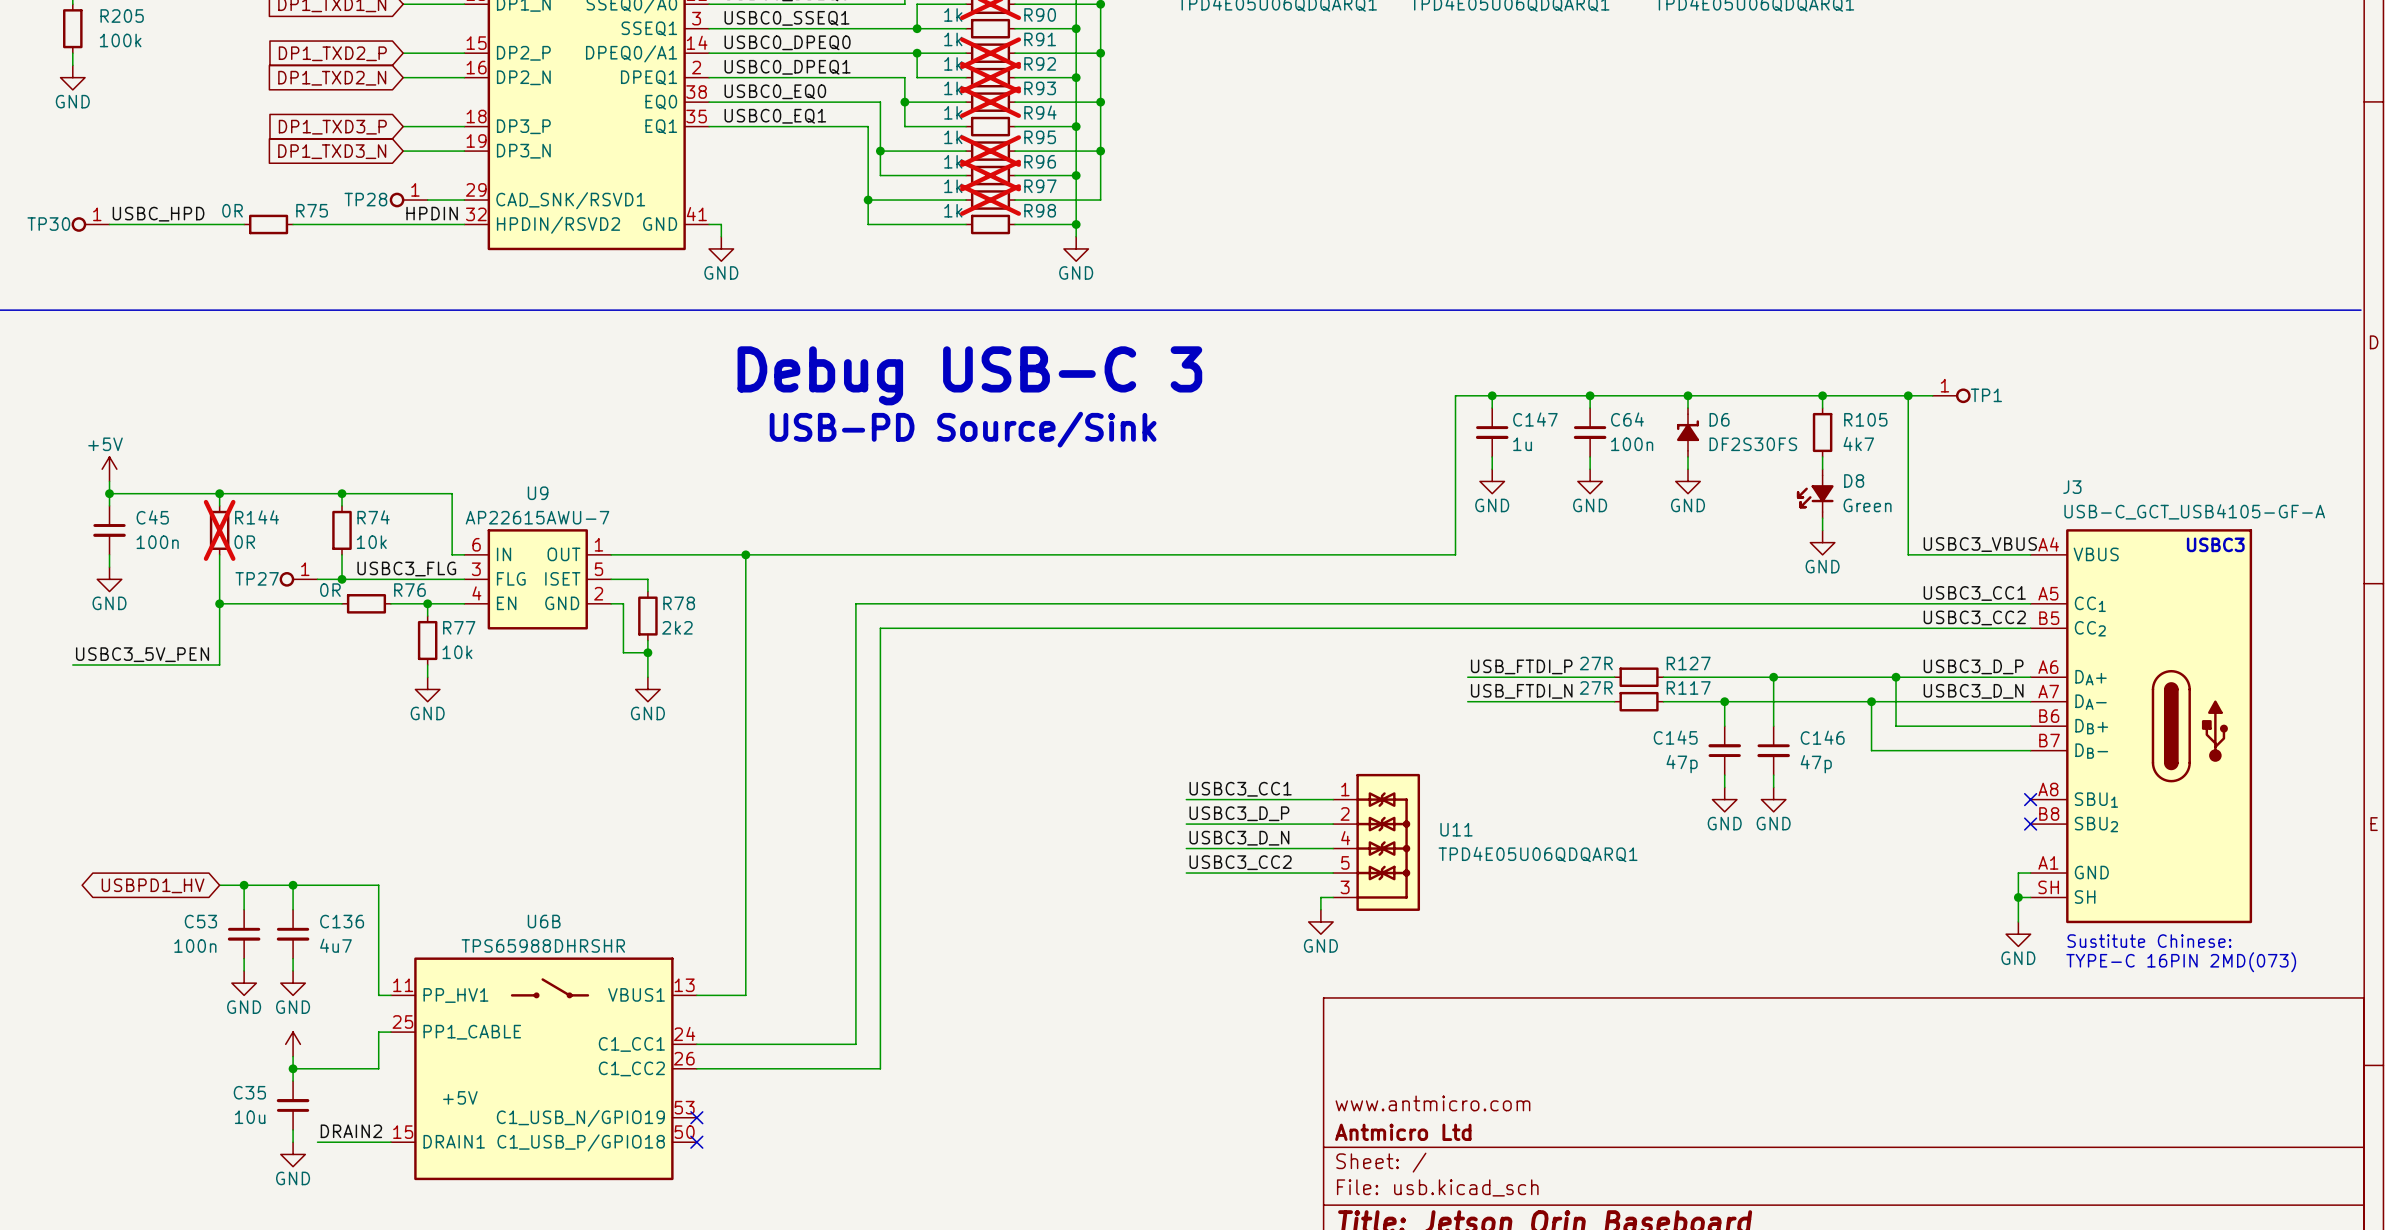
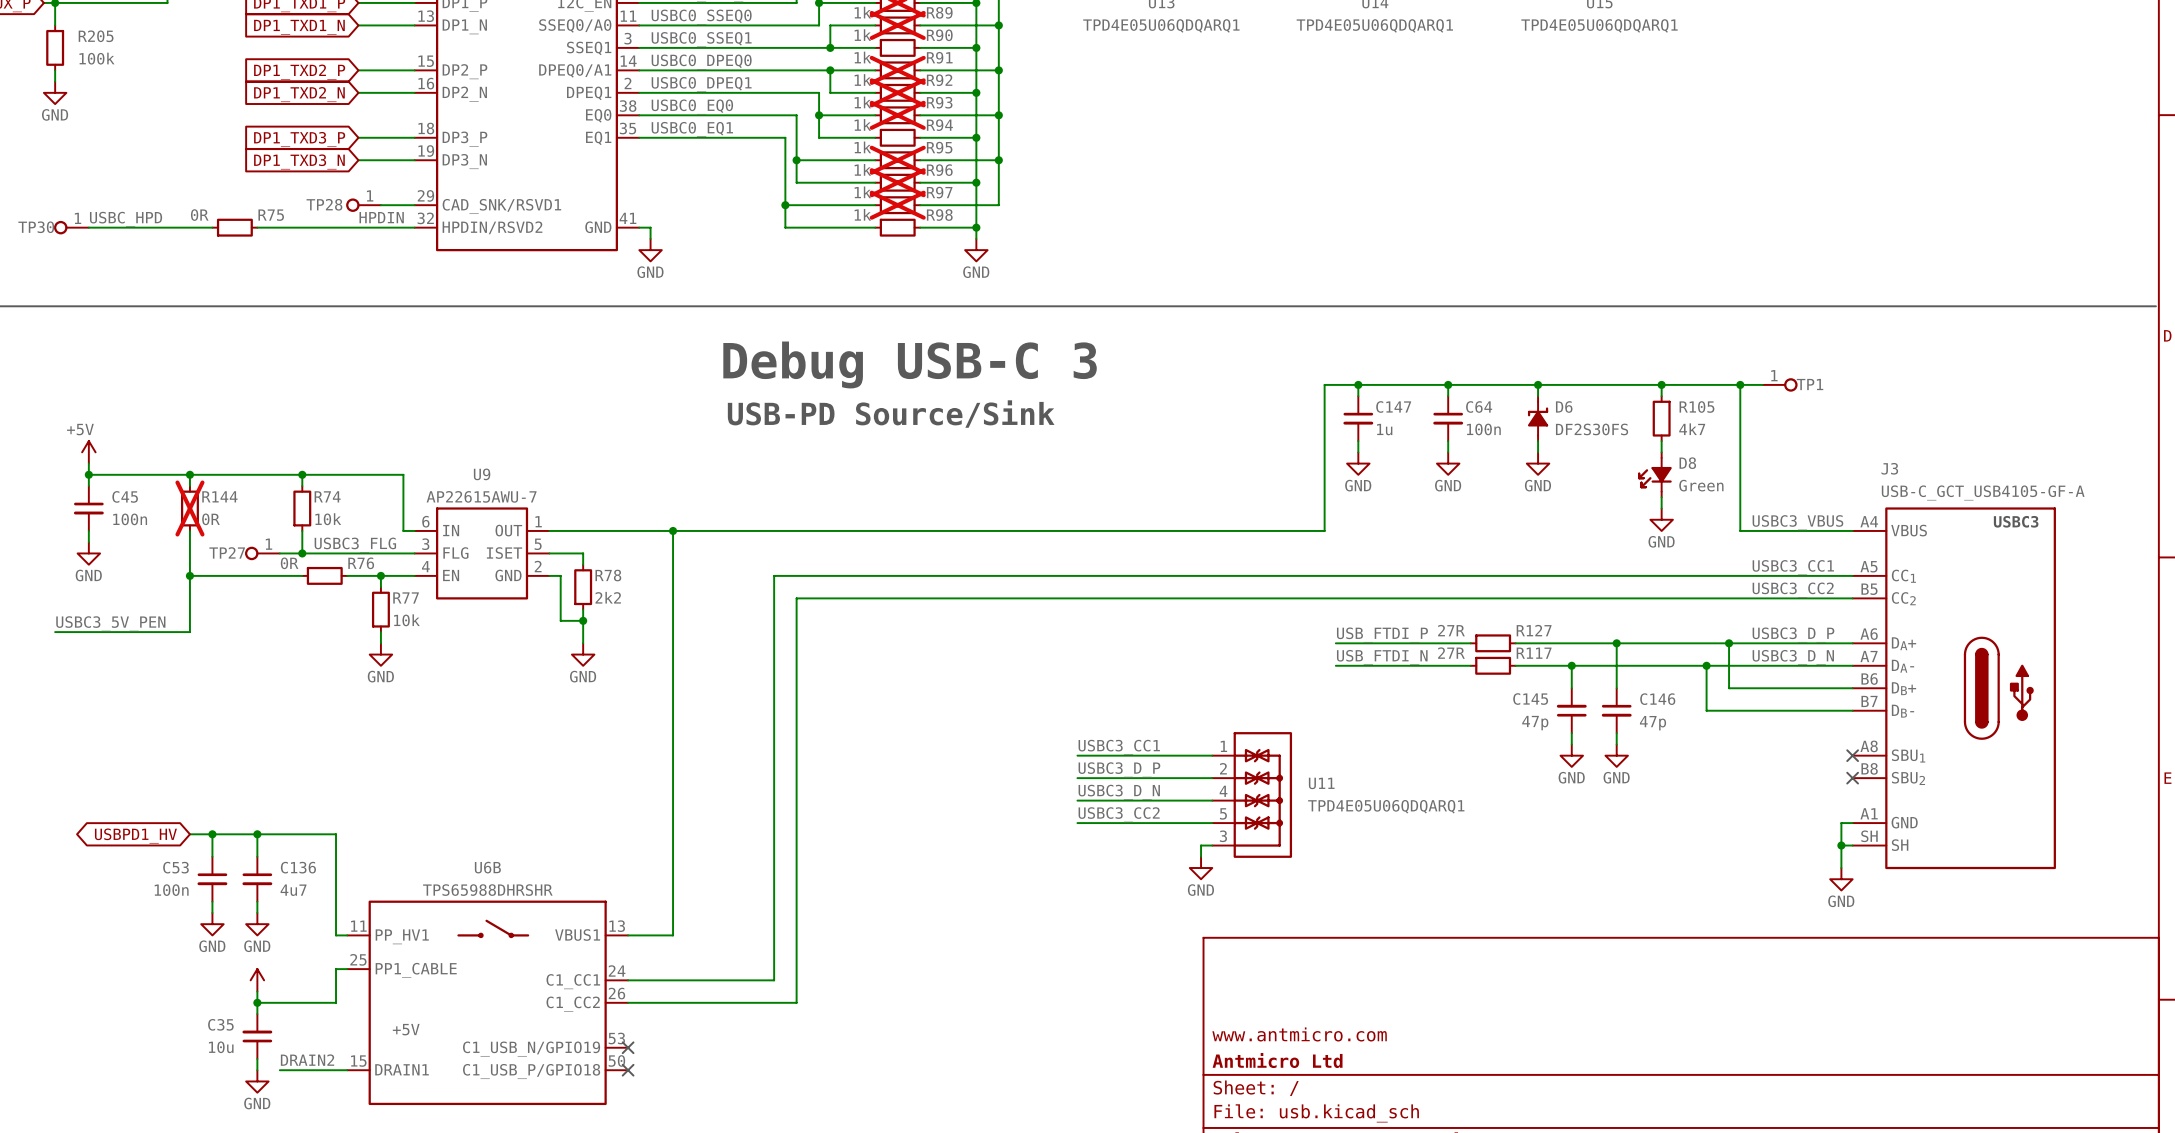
text: Sustitute Chinese: (2149, 941) -> none
text: TYPE-C 16PIN 2MD(073) (2181, 962) -> none

